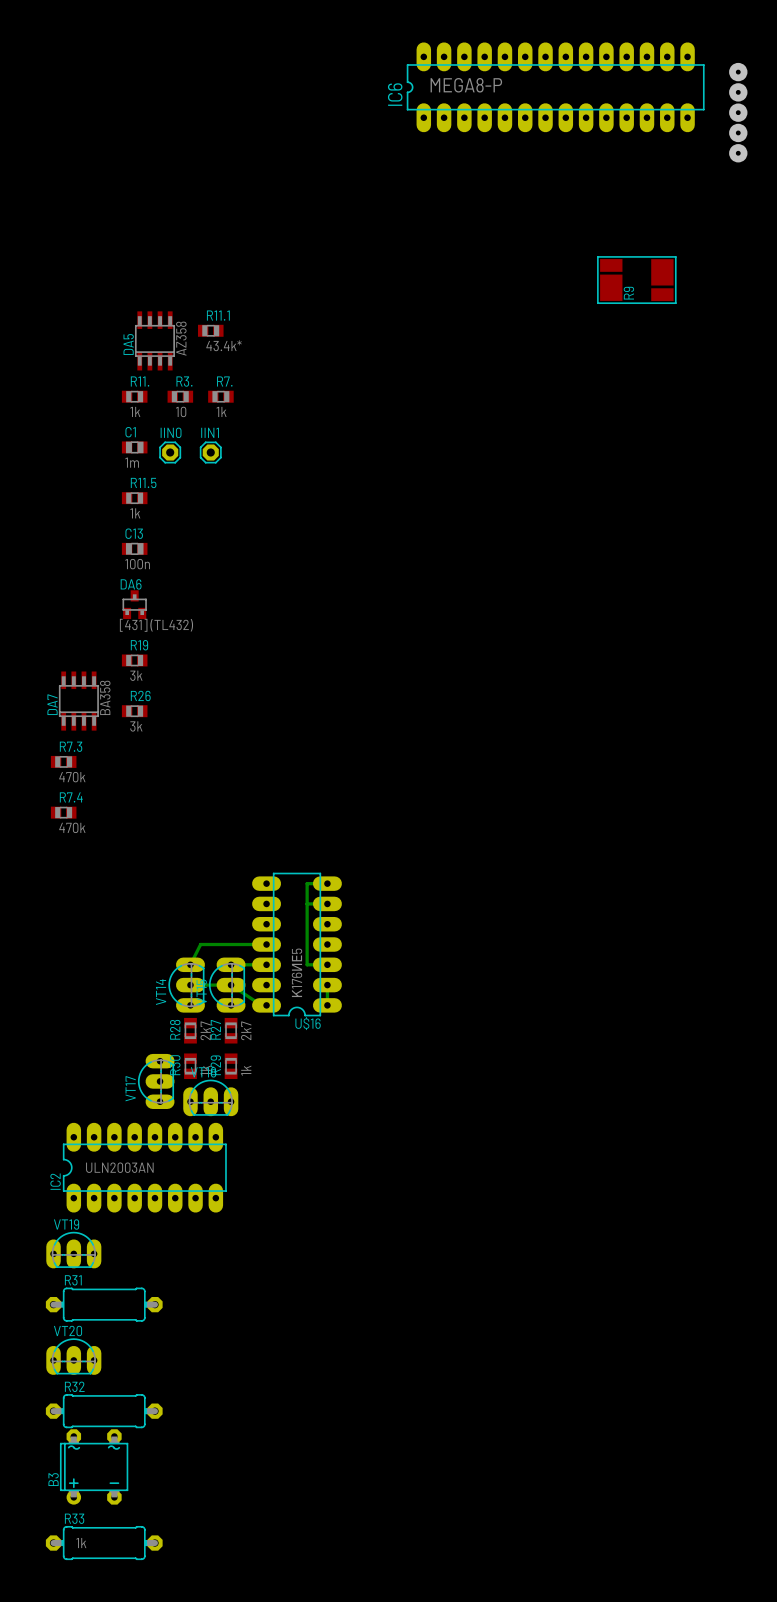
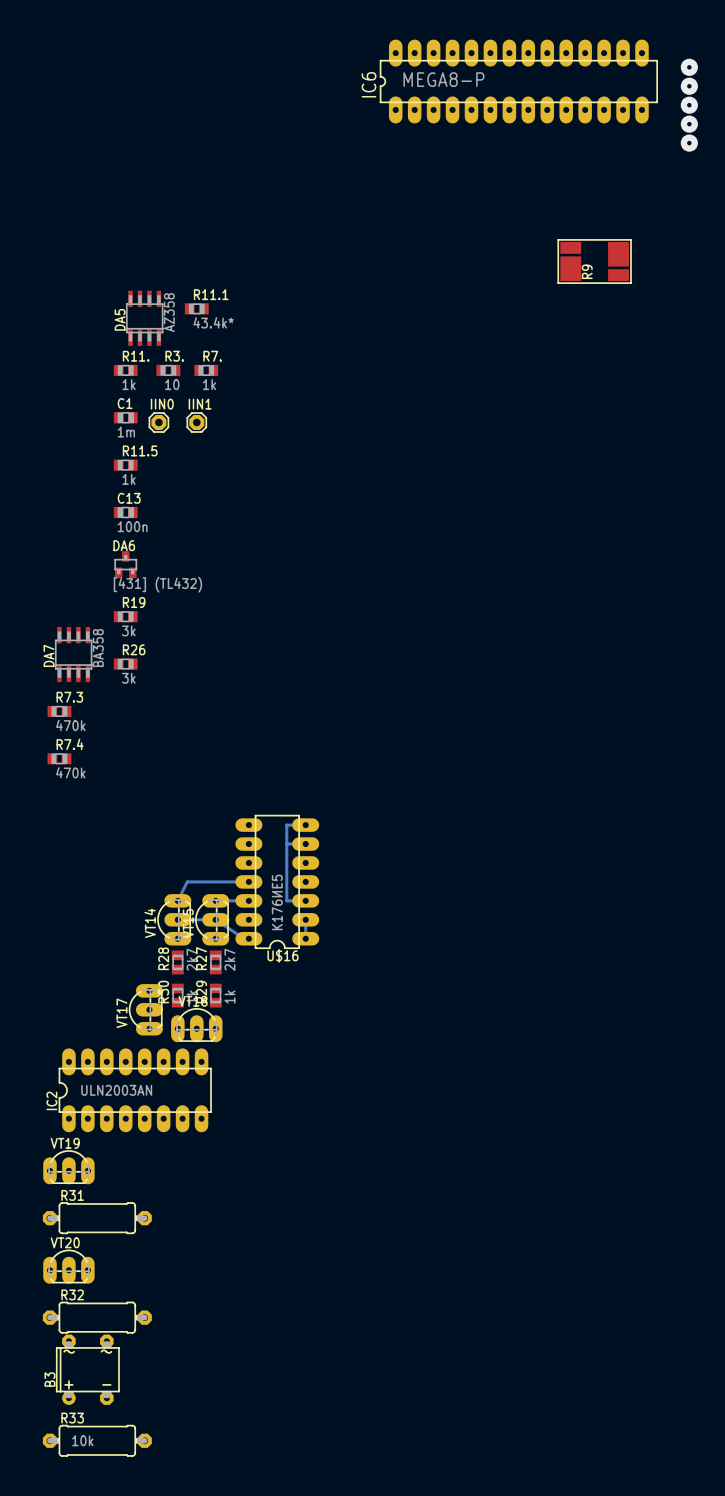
R33 value: 1k (81, 1543) -> 10k (82, 1440)

